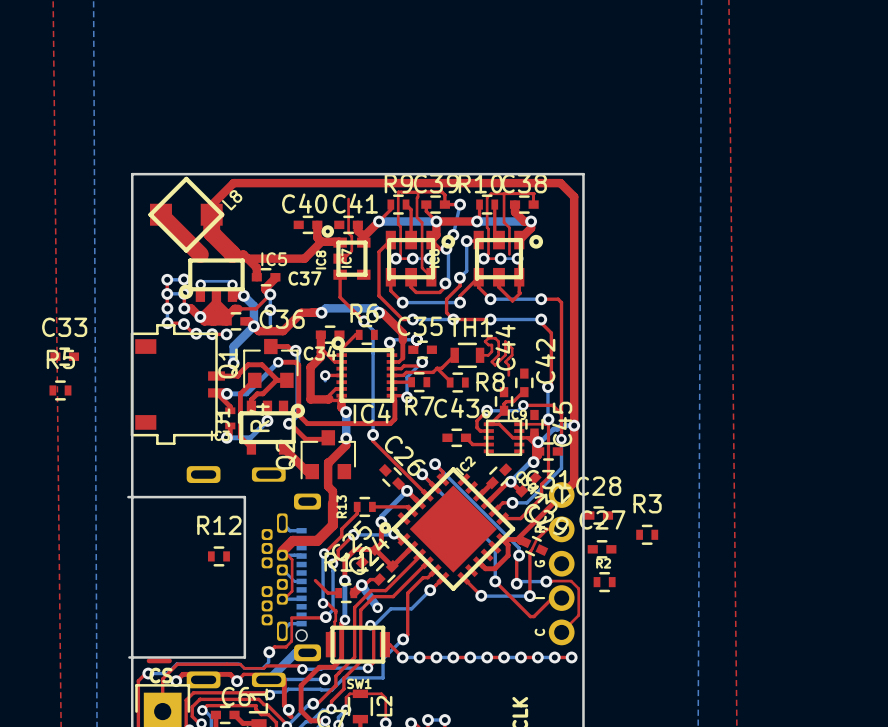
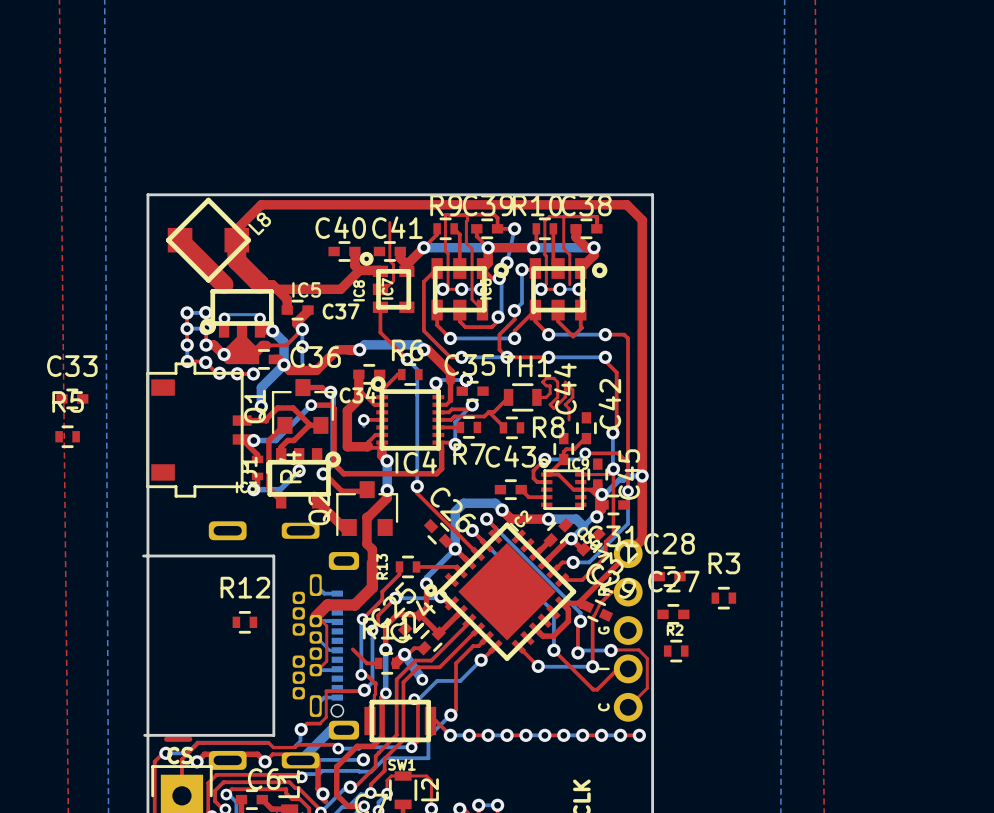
top track: none -> (502, 510) (511, 519) (548, 519)
bottom track: none -> (502, 510) (495, 503) (463, 503) (455, 511) (455, 549)
via: none -> (502, 510)
bottom track: none -> (548, 519) (576, 519) (583, 526)
via: none -> (548, 519)

